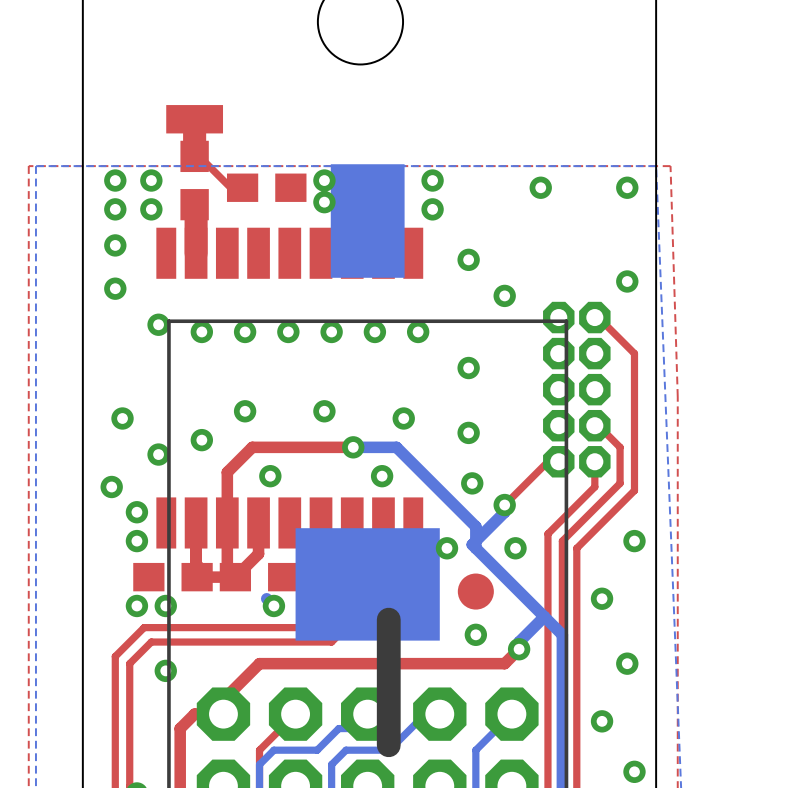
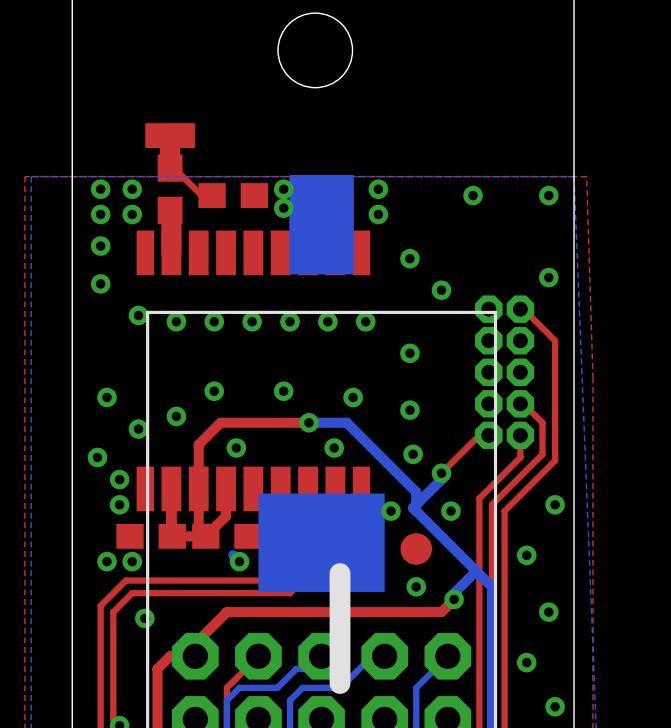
via: none -> (106, 561)
via: (136, 605) -> none
via: none -> (132, 561)
via: (165, 605) -> none

